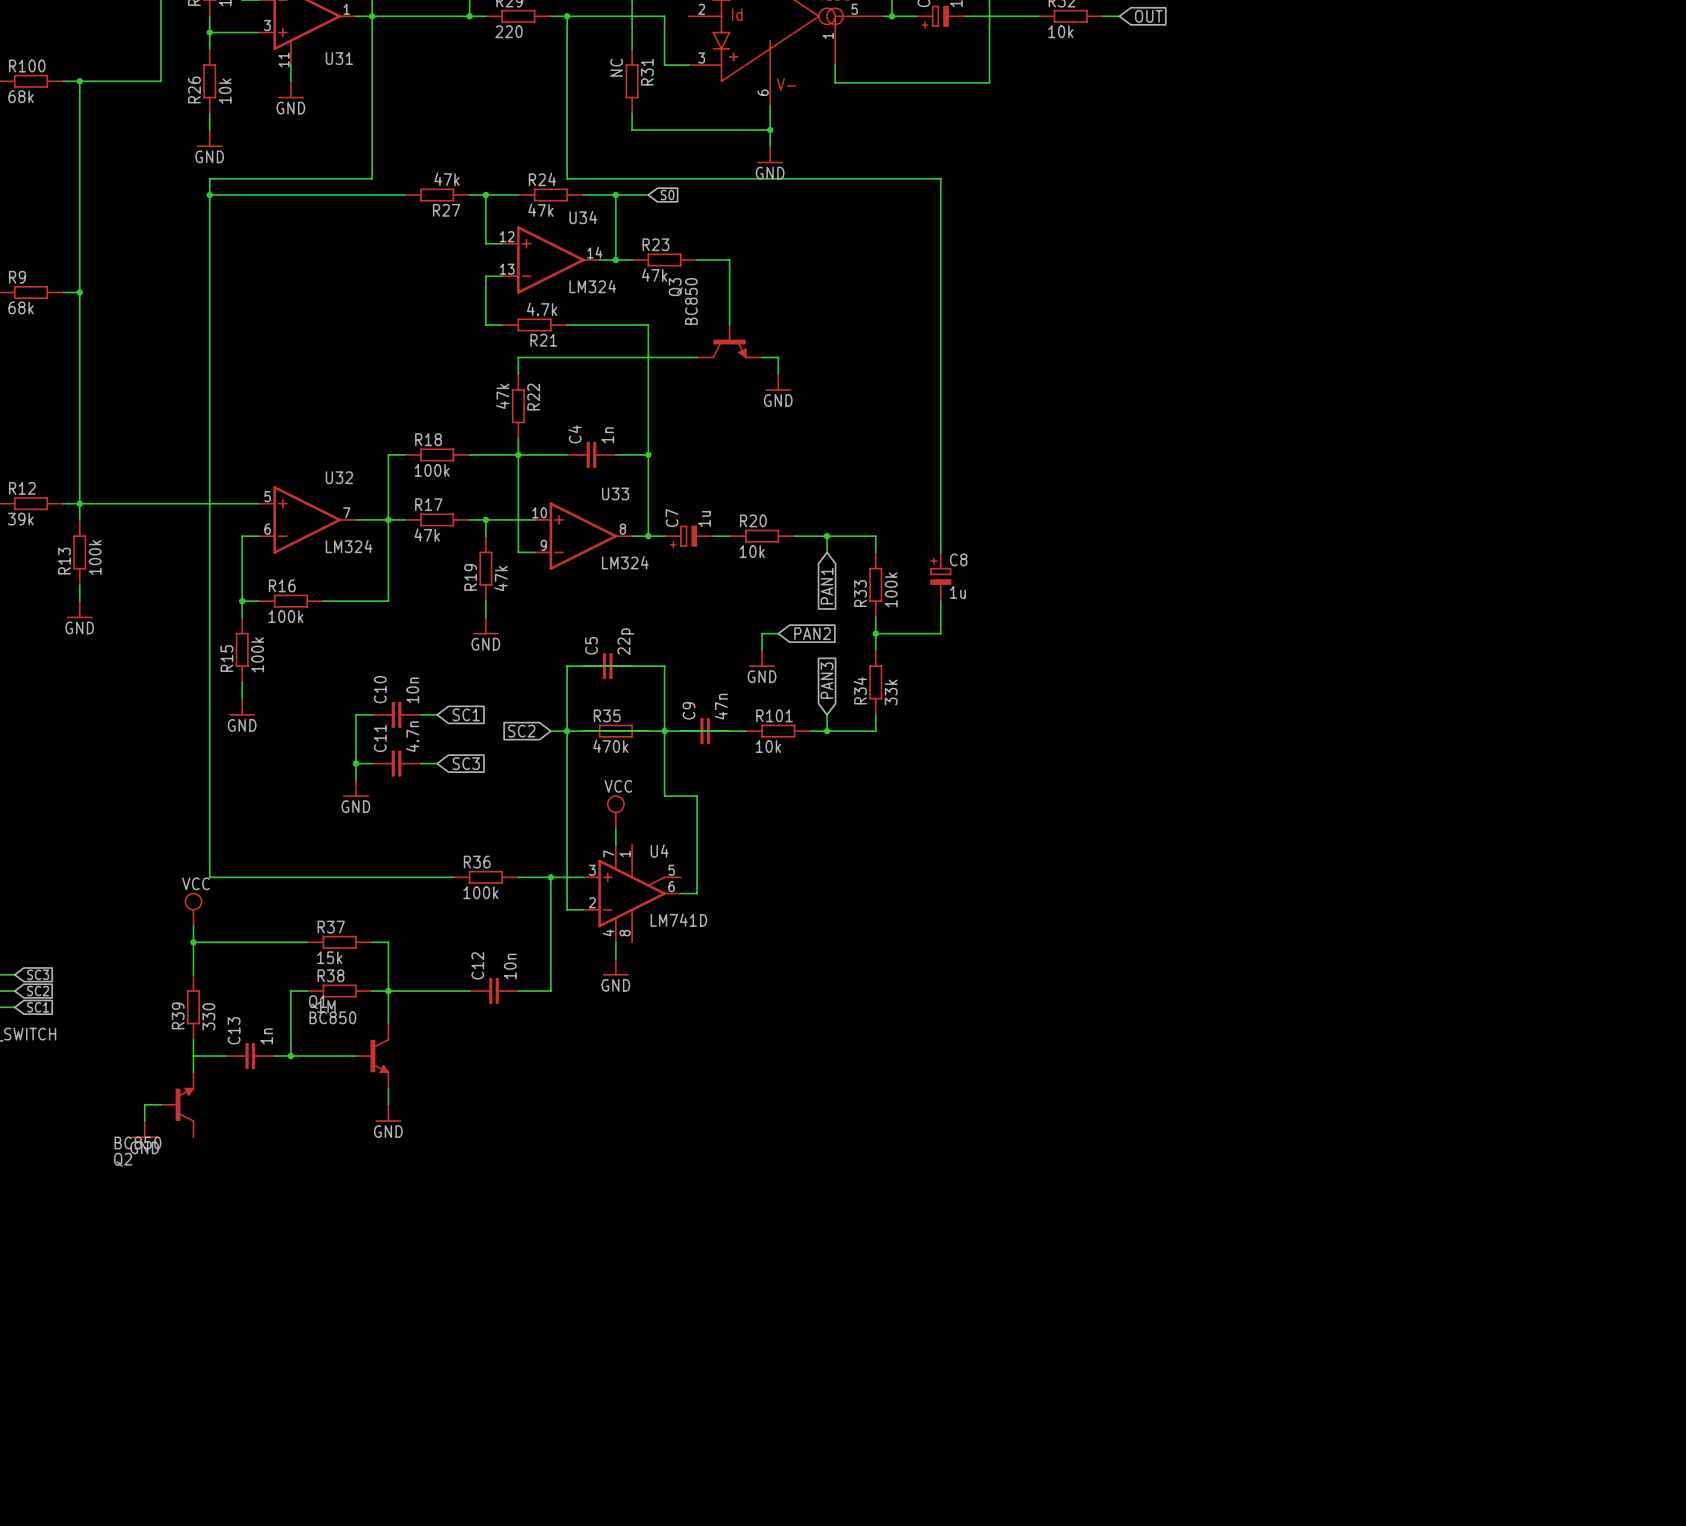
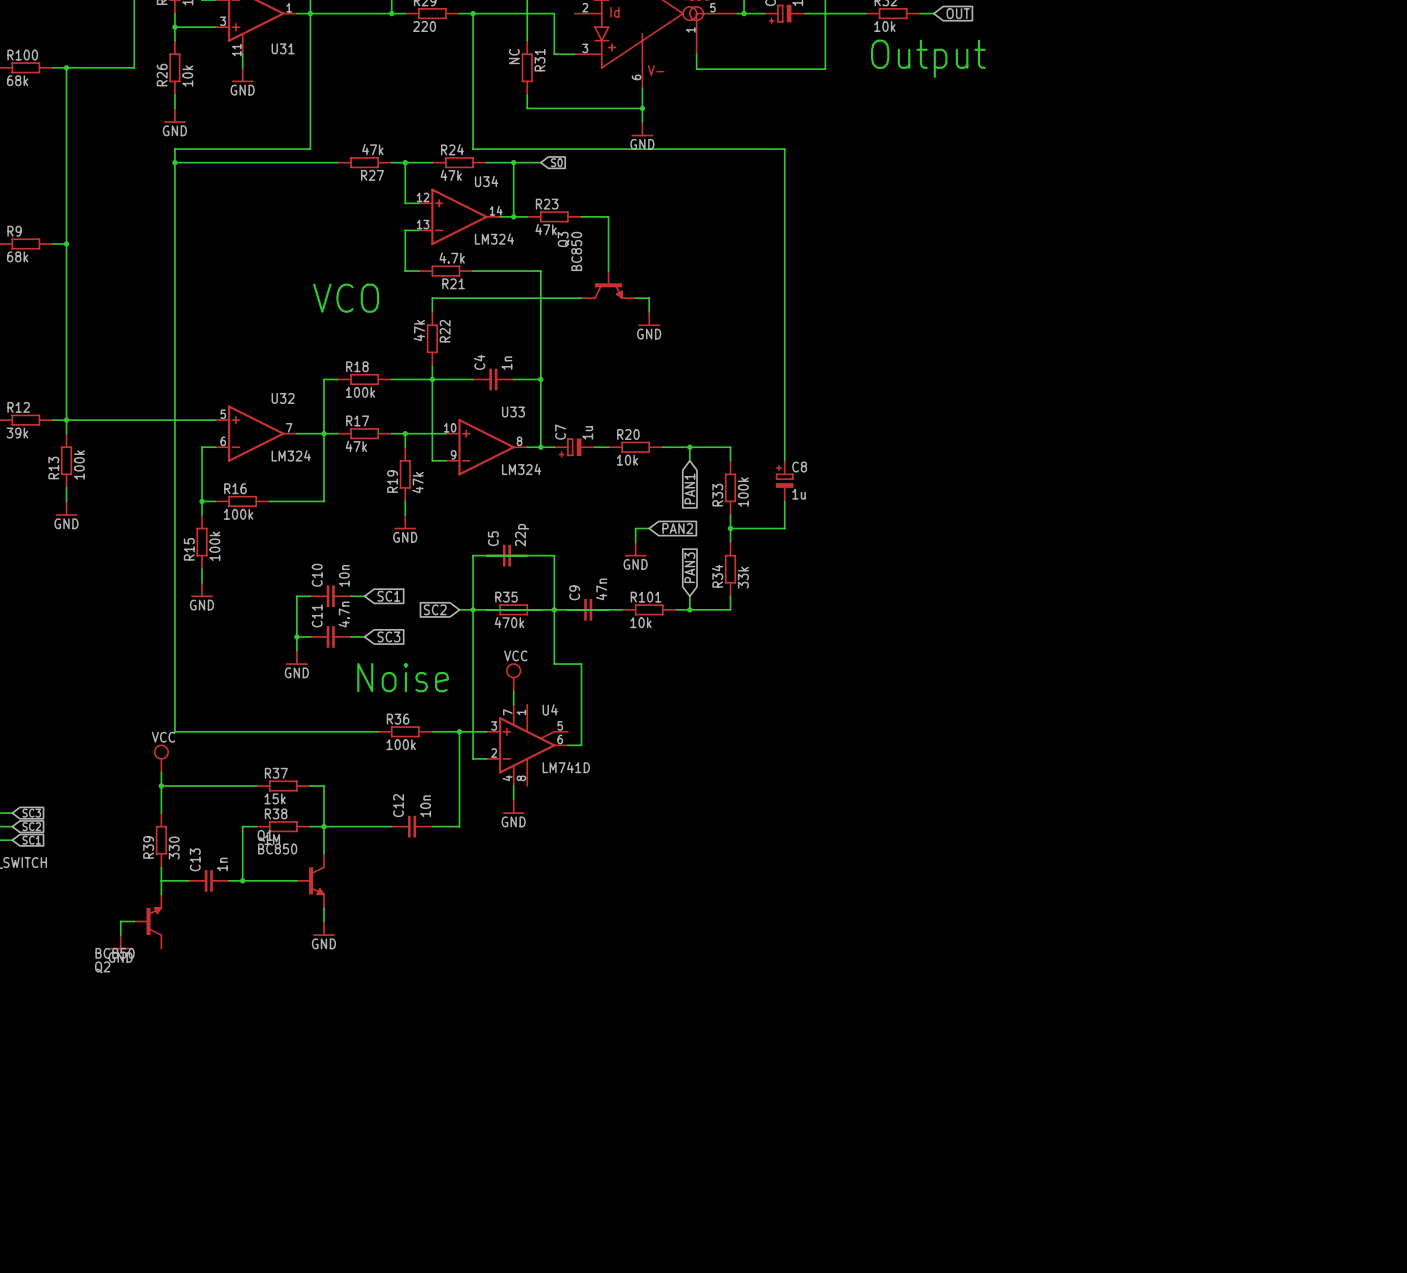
text: none -> Output (928, 58)
text: none -> VCO (346, 298)
text: none -> Noise (403, 677)

